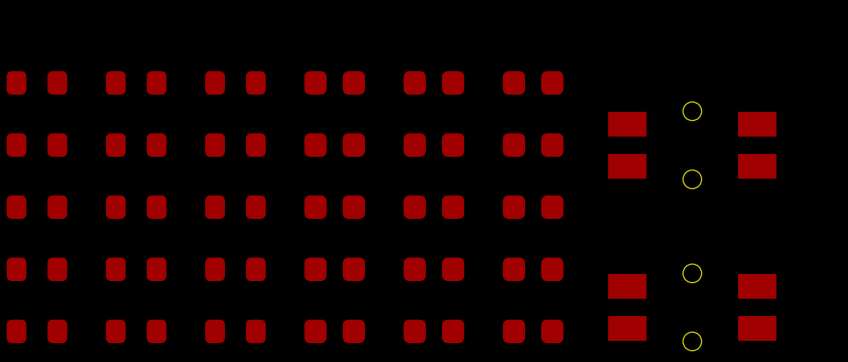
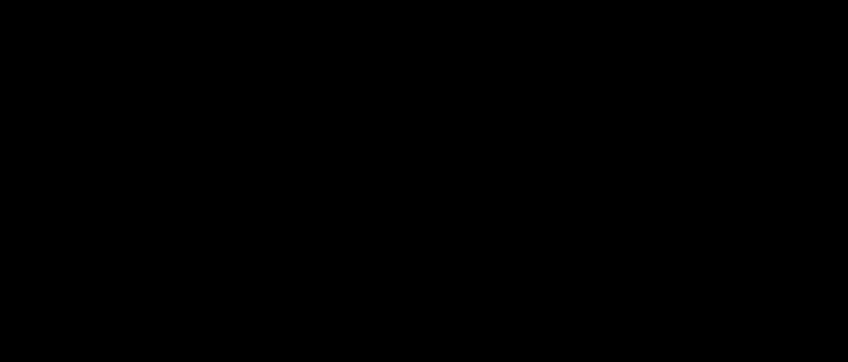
part: (36, 82) -> none
part: (136, 82) -> none
part: (235, 82) -> none
part: (334, 82) -> none
part: (433, 82) -> none
part: (533, 82) -> none
part: (36, 145) -> none
part: (136, 145) -> none
part: (235, 145) -> none
part: (334, 145) -> none
part: (433, 145) -> none
part: (533, 145) -> none
part: (692, 145) -> none
part: (36, 207) -> none
part: (136, 207) -> none
part: (235, 207) -> none
part: (334, 207) -> none
part: (433, 207) -> none
part: (533, 207) -> none
part: (36, 269) -> none
part: (136, 269) -> none
part: (235, 269) -> none
part: (334, 269) -> none
part: (433, 269) -> none
part: (533, 269) -> none
part: (692, 307) -> none
part: (36, 331) -> none
part: (136, 331) -> none
part: (235, 331) -> none
part: (334, 331) -> none
part: (433, 331) -> none
part: (533, 331) -> none

